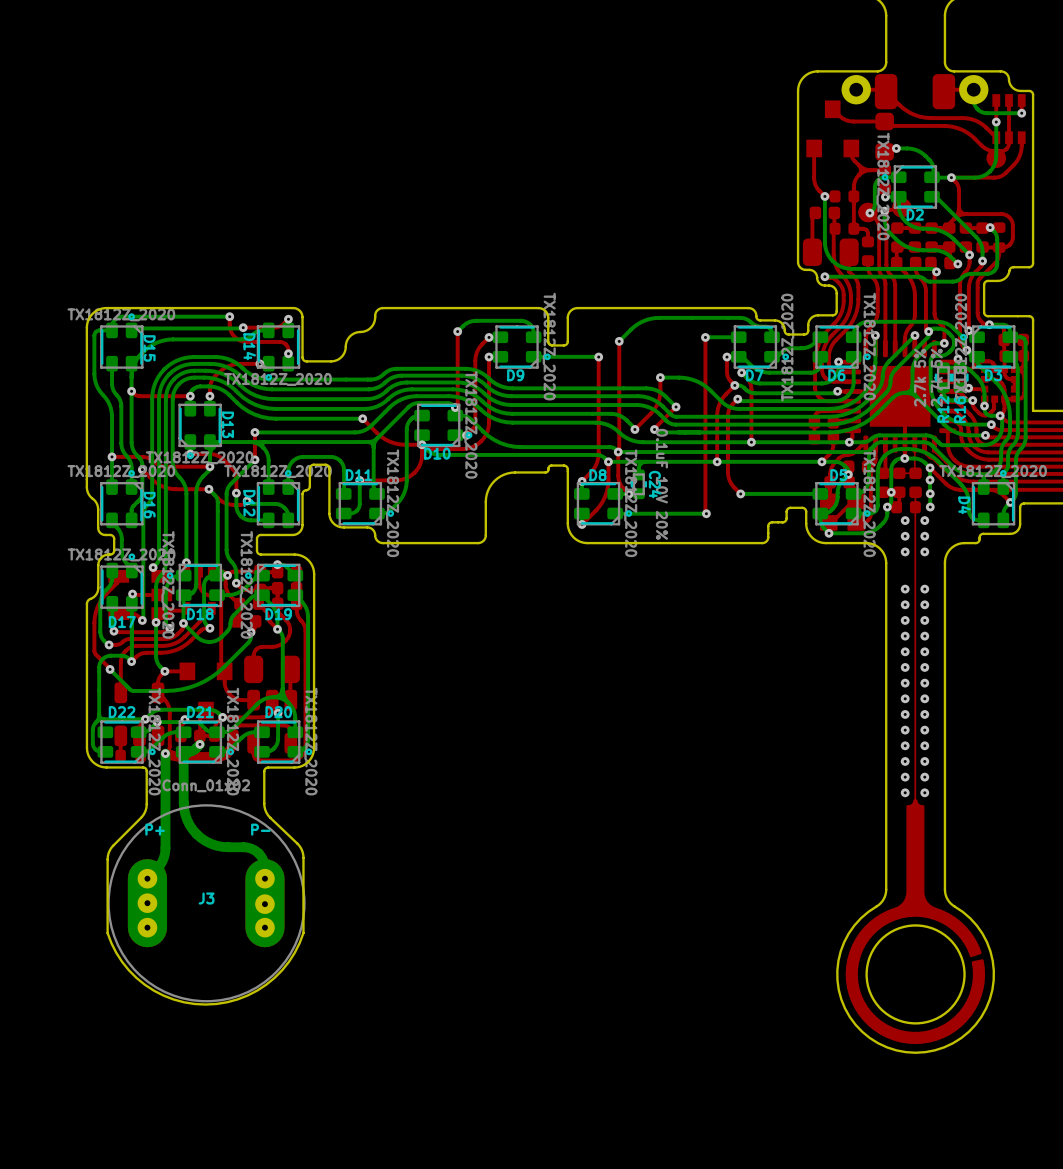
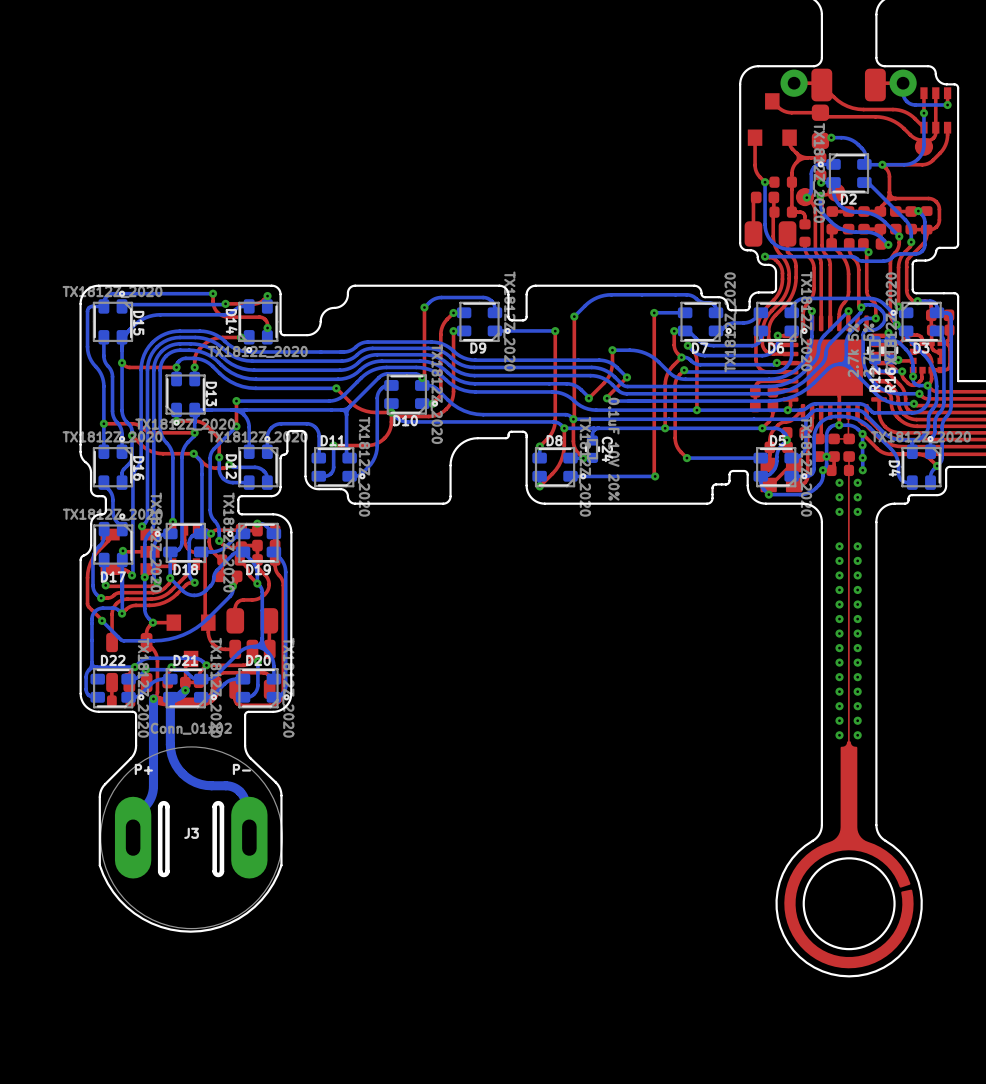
J3 footprint: [107, 804, 306, 1003] -> [100, 746, 283, 930]
board edge: none -> (167, 806) (167, 871) (163, 874) (160, 871) (160, 806) (163, 803) (167, 806)
board edge: none -> (221, 806) (221, 871) (218, 874) (214, 871) (214, 806) (218, 803) (221, 806)

